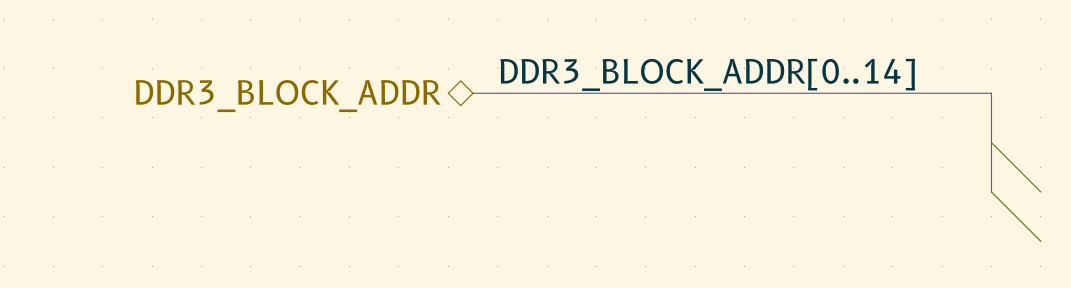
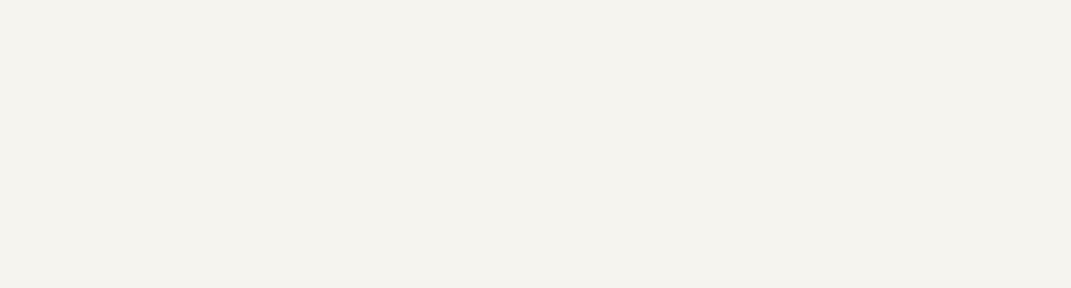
label: DDR3_BLOCK_ADDR[0..14] (707, 74) -> none
bus: (472, 93) (991, 93) (991, 192) -> none
hierarchical label: DDR3_BLOCK_ADDR (288, 96) -> none
wire: (991, 142) (1040, 192) -> none
wire: (991, 192) (1040, 241) -> none

